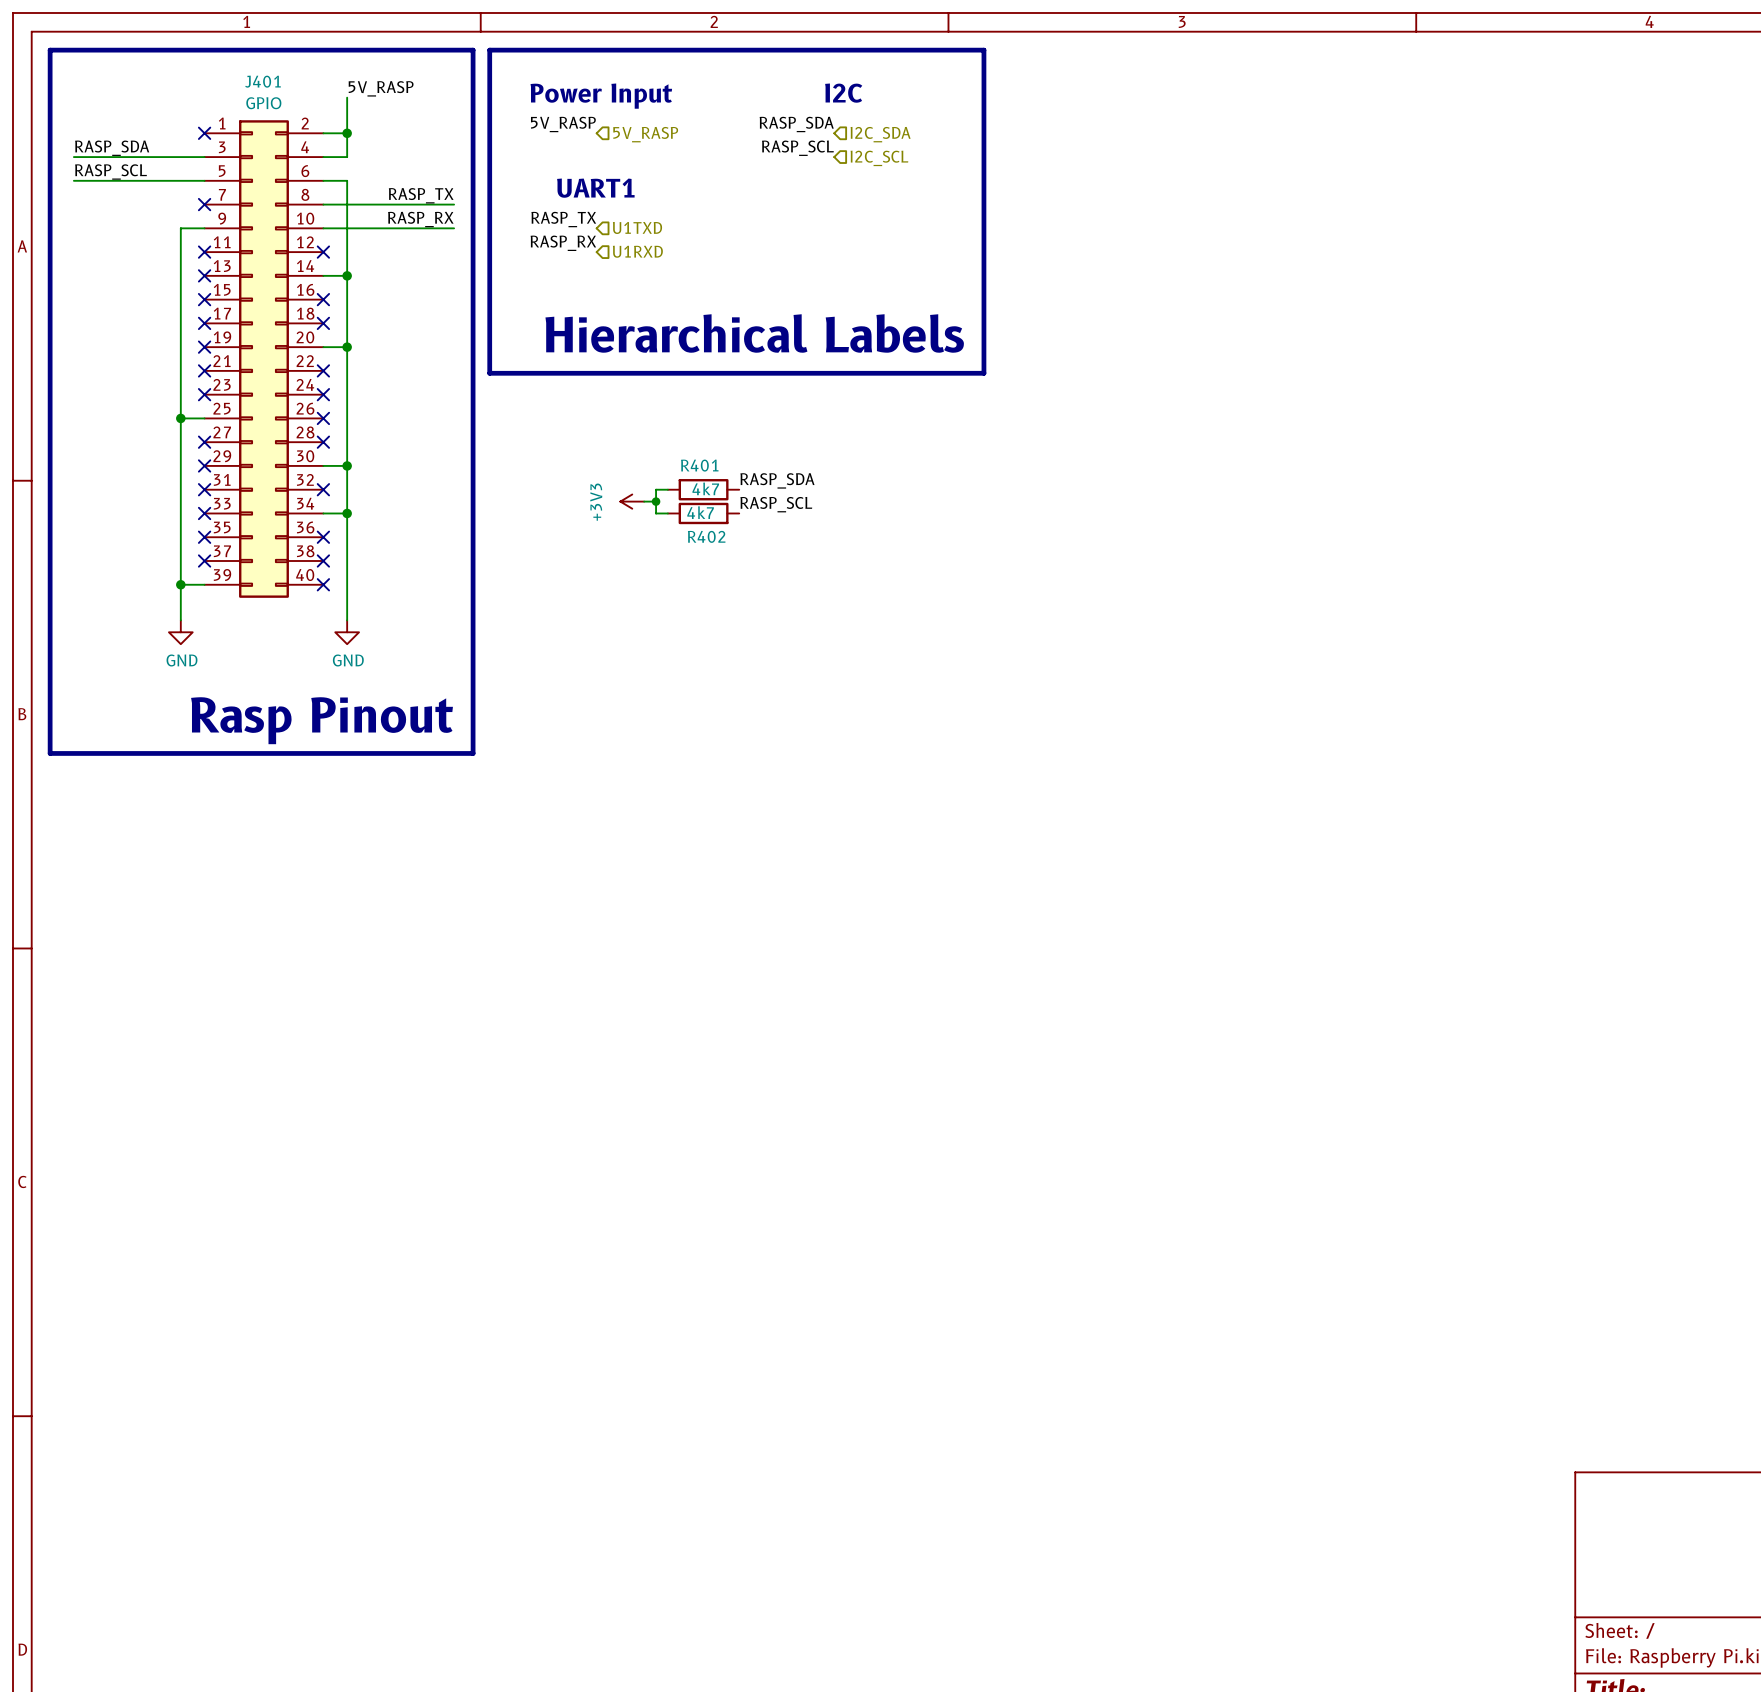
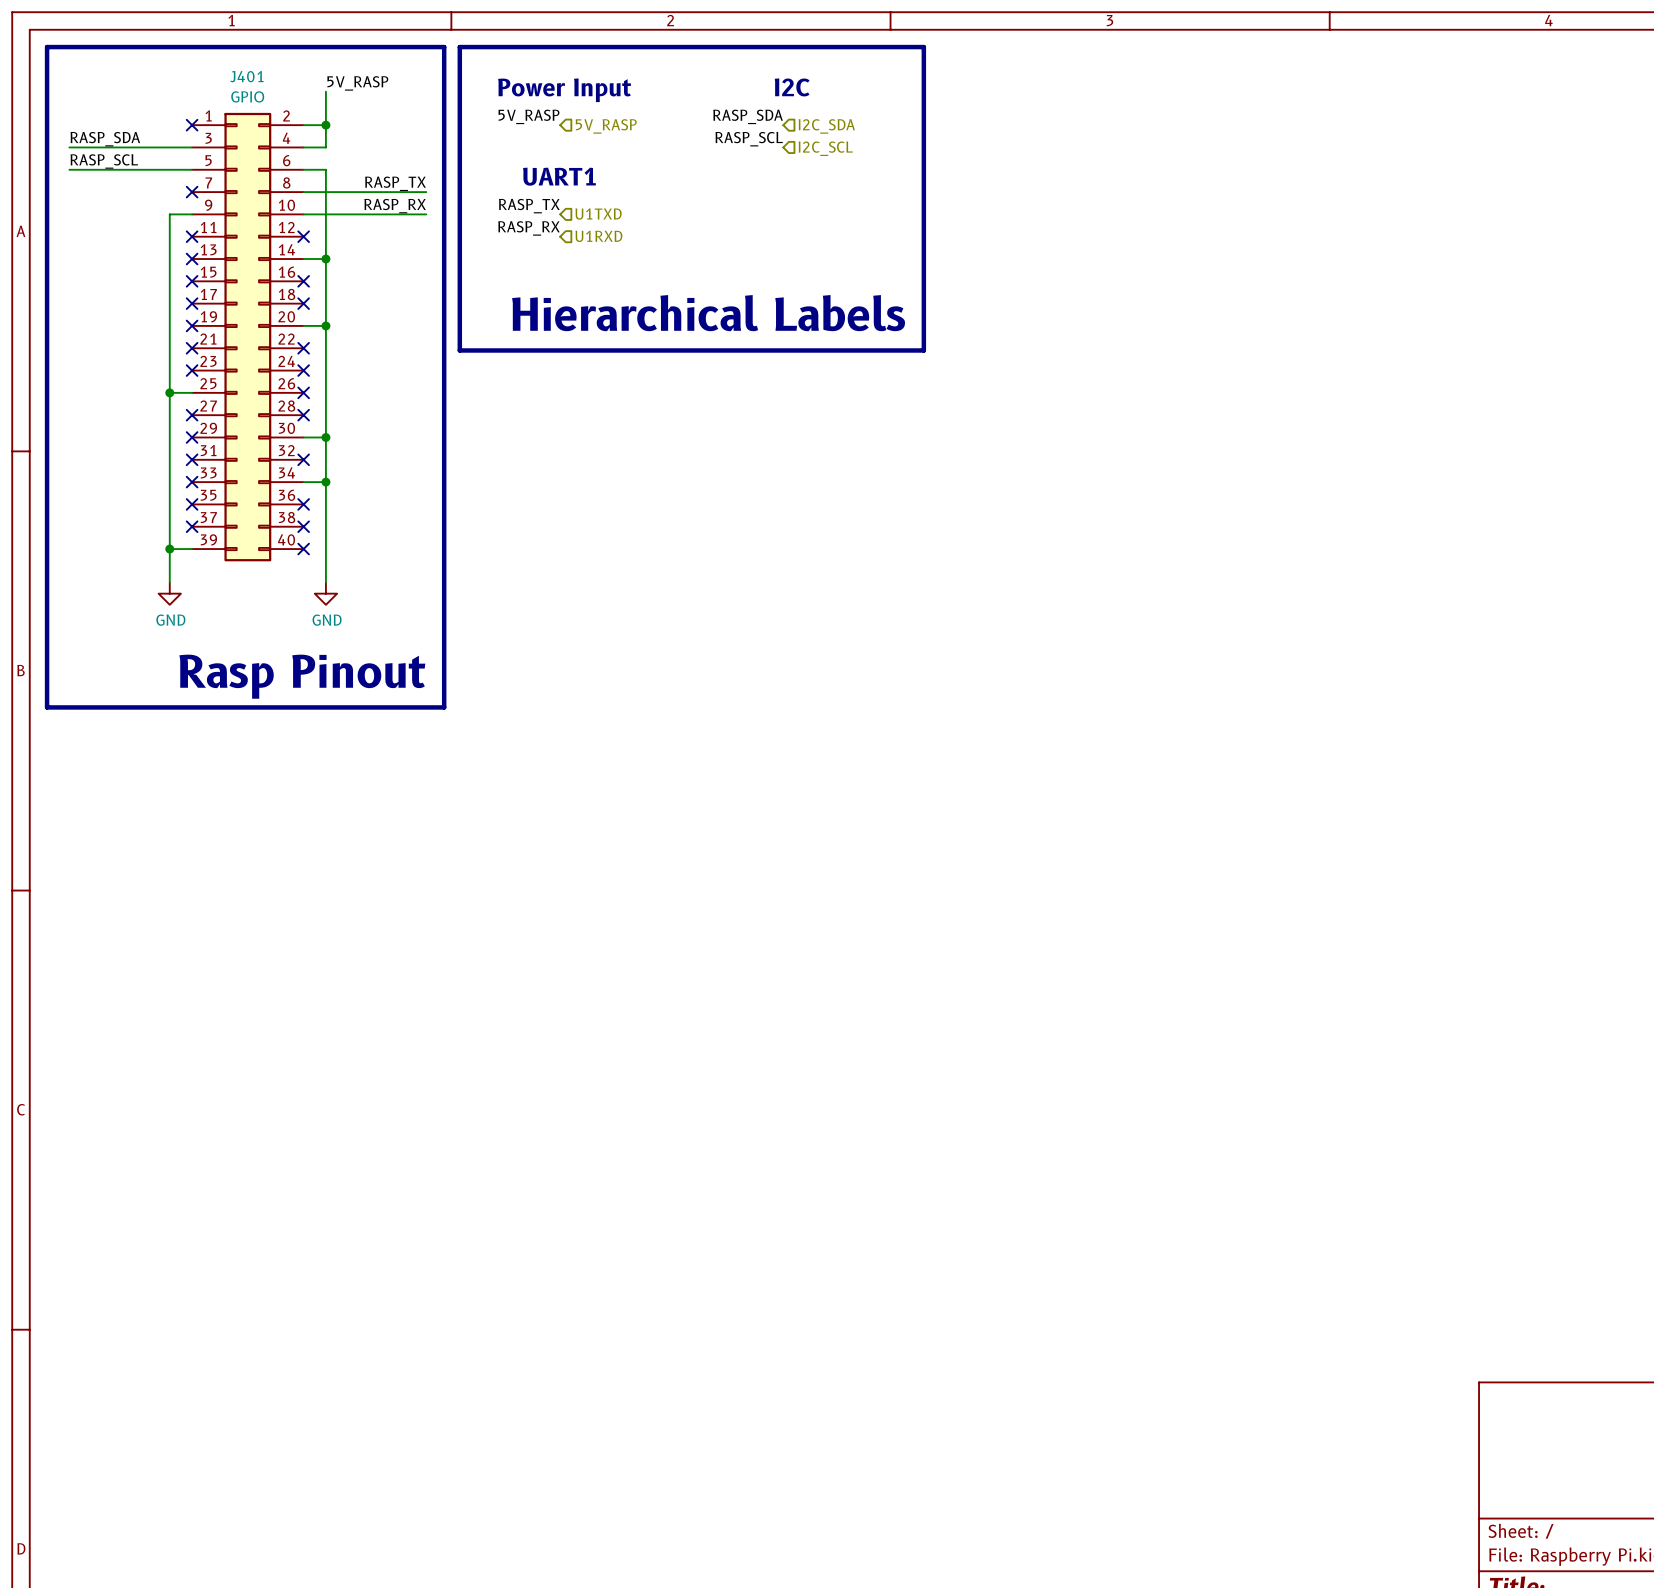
label: RASP_SDA (777, 480) -> none
wire: (667, 489) (656, 489) (656, 513) (667, 513) -> none
R401: 4k7 (703, 489) -> none
power symbol: +3V3 (632, 501) -> none
wire: (644, 501) (656, 501) -> none
junction: (656, 501) -> none
label: RASP_SCL (776, 504) -> none
R402: 4k7 (703, 513) -> none

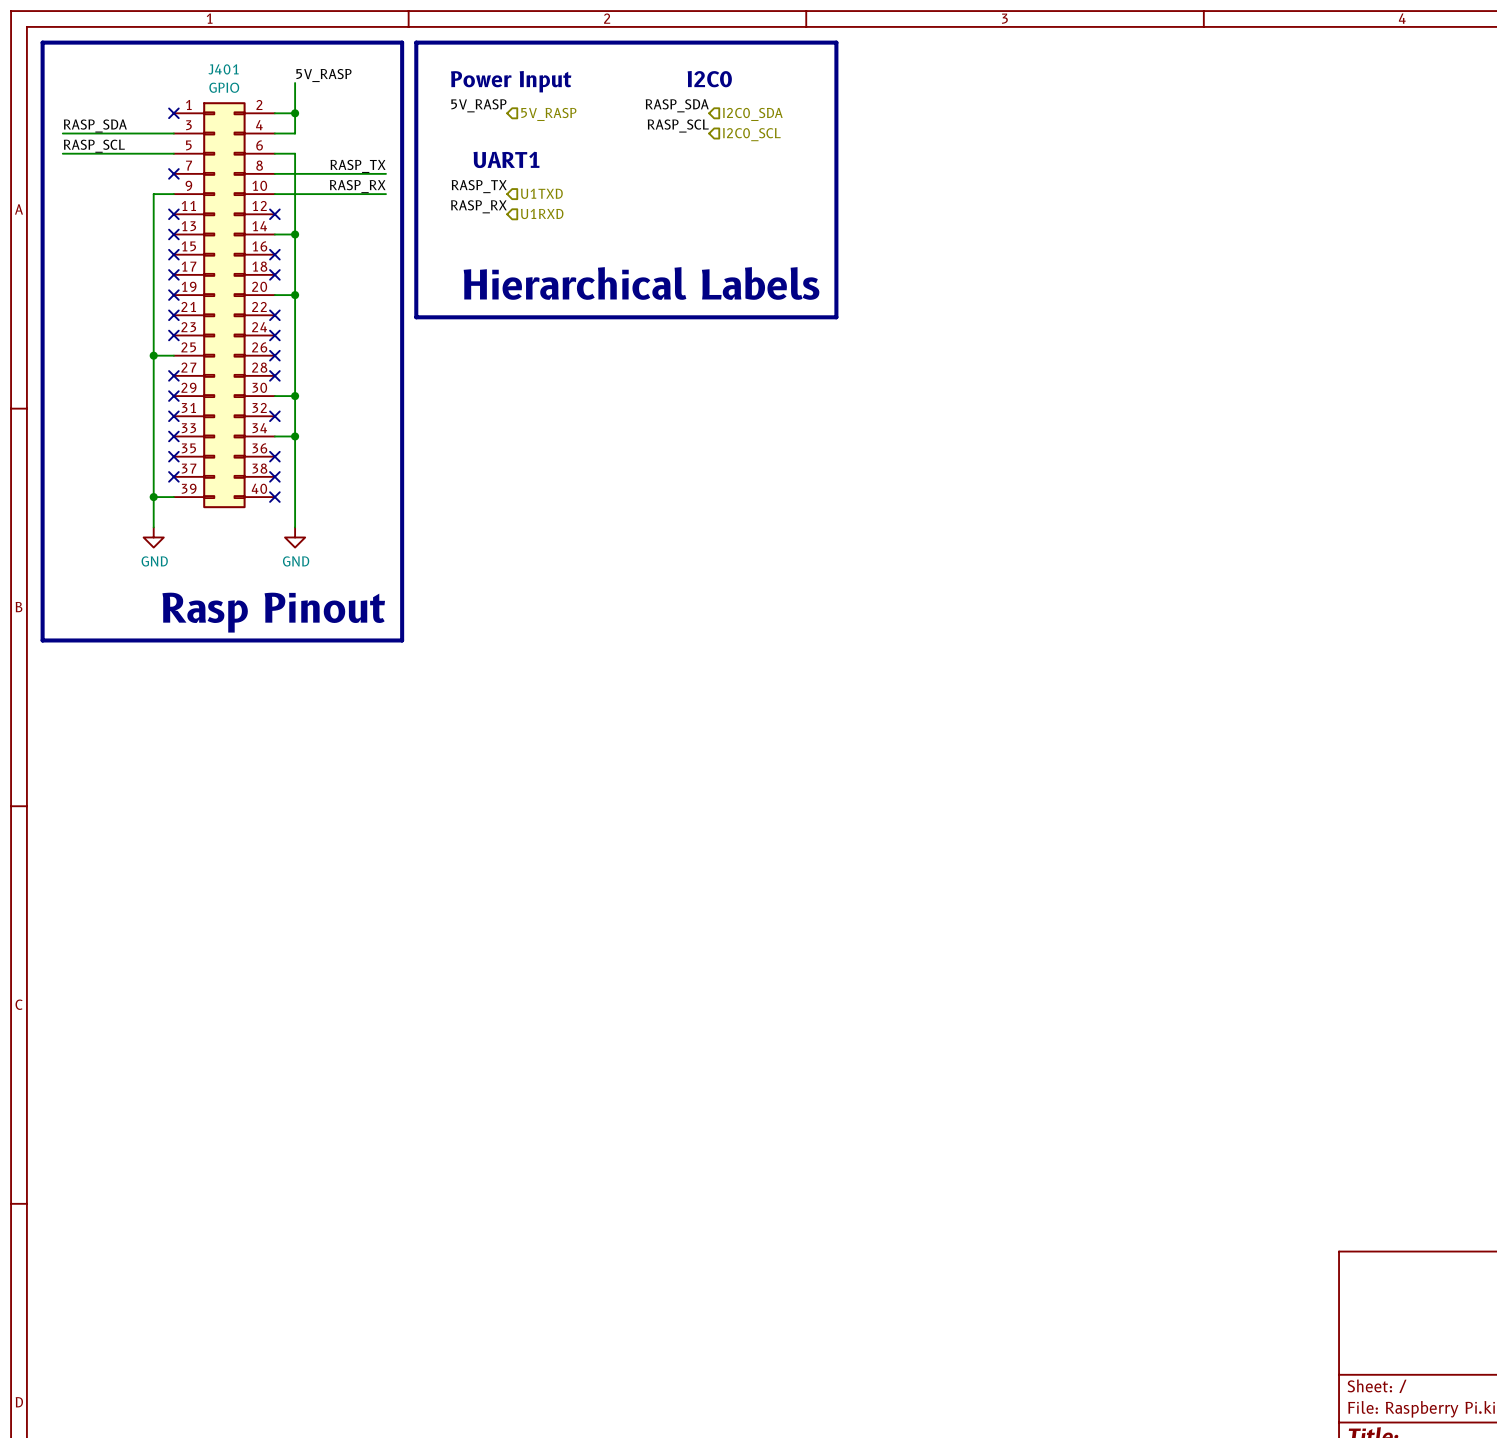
text: I2C (792, 87) -> I2C0 (709, 79)
hierarchical label: I2C_SDA (826, 126) -> I2C0_SDA (752, 114)
hierarchical label: I2C_SCL (825, 148) -> I2C0_SCL (751, 134)

